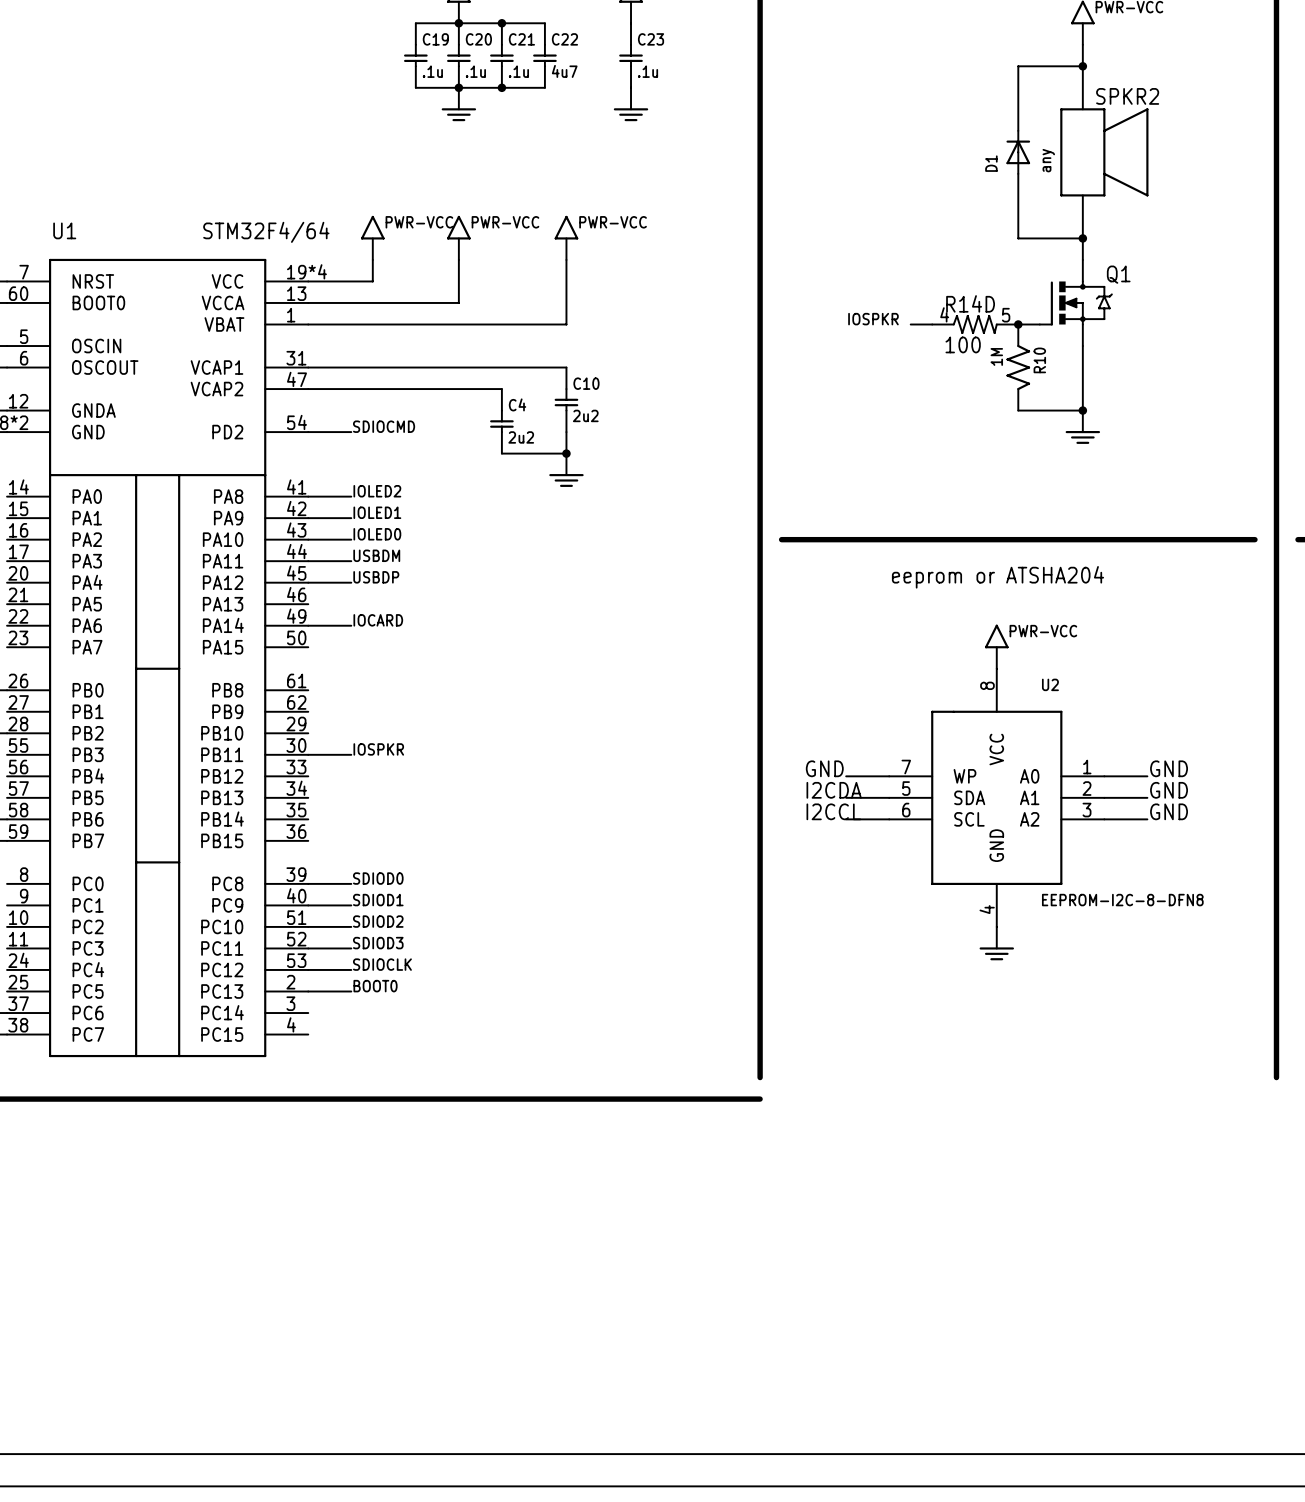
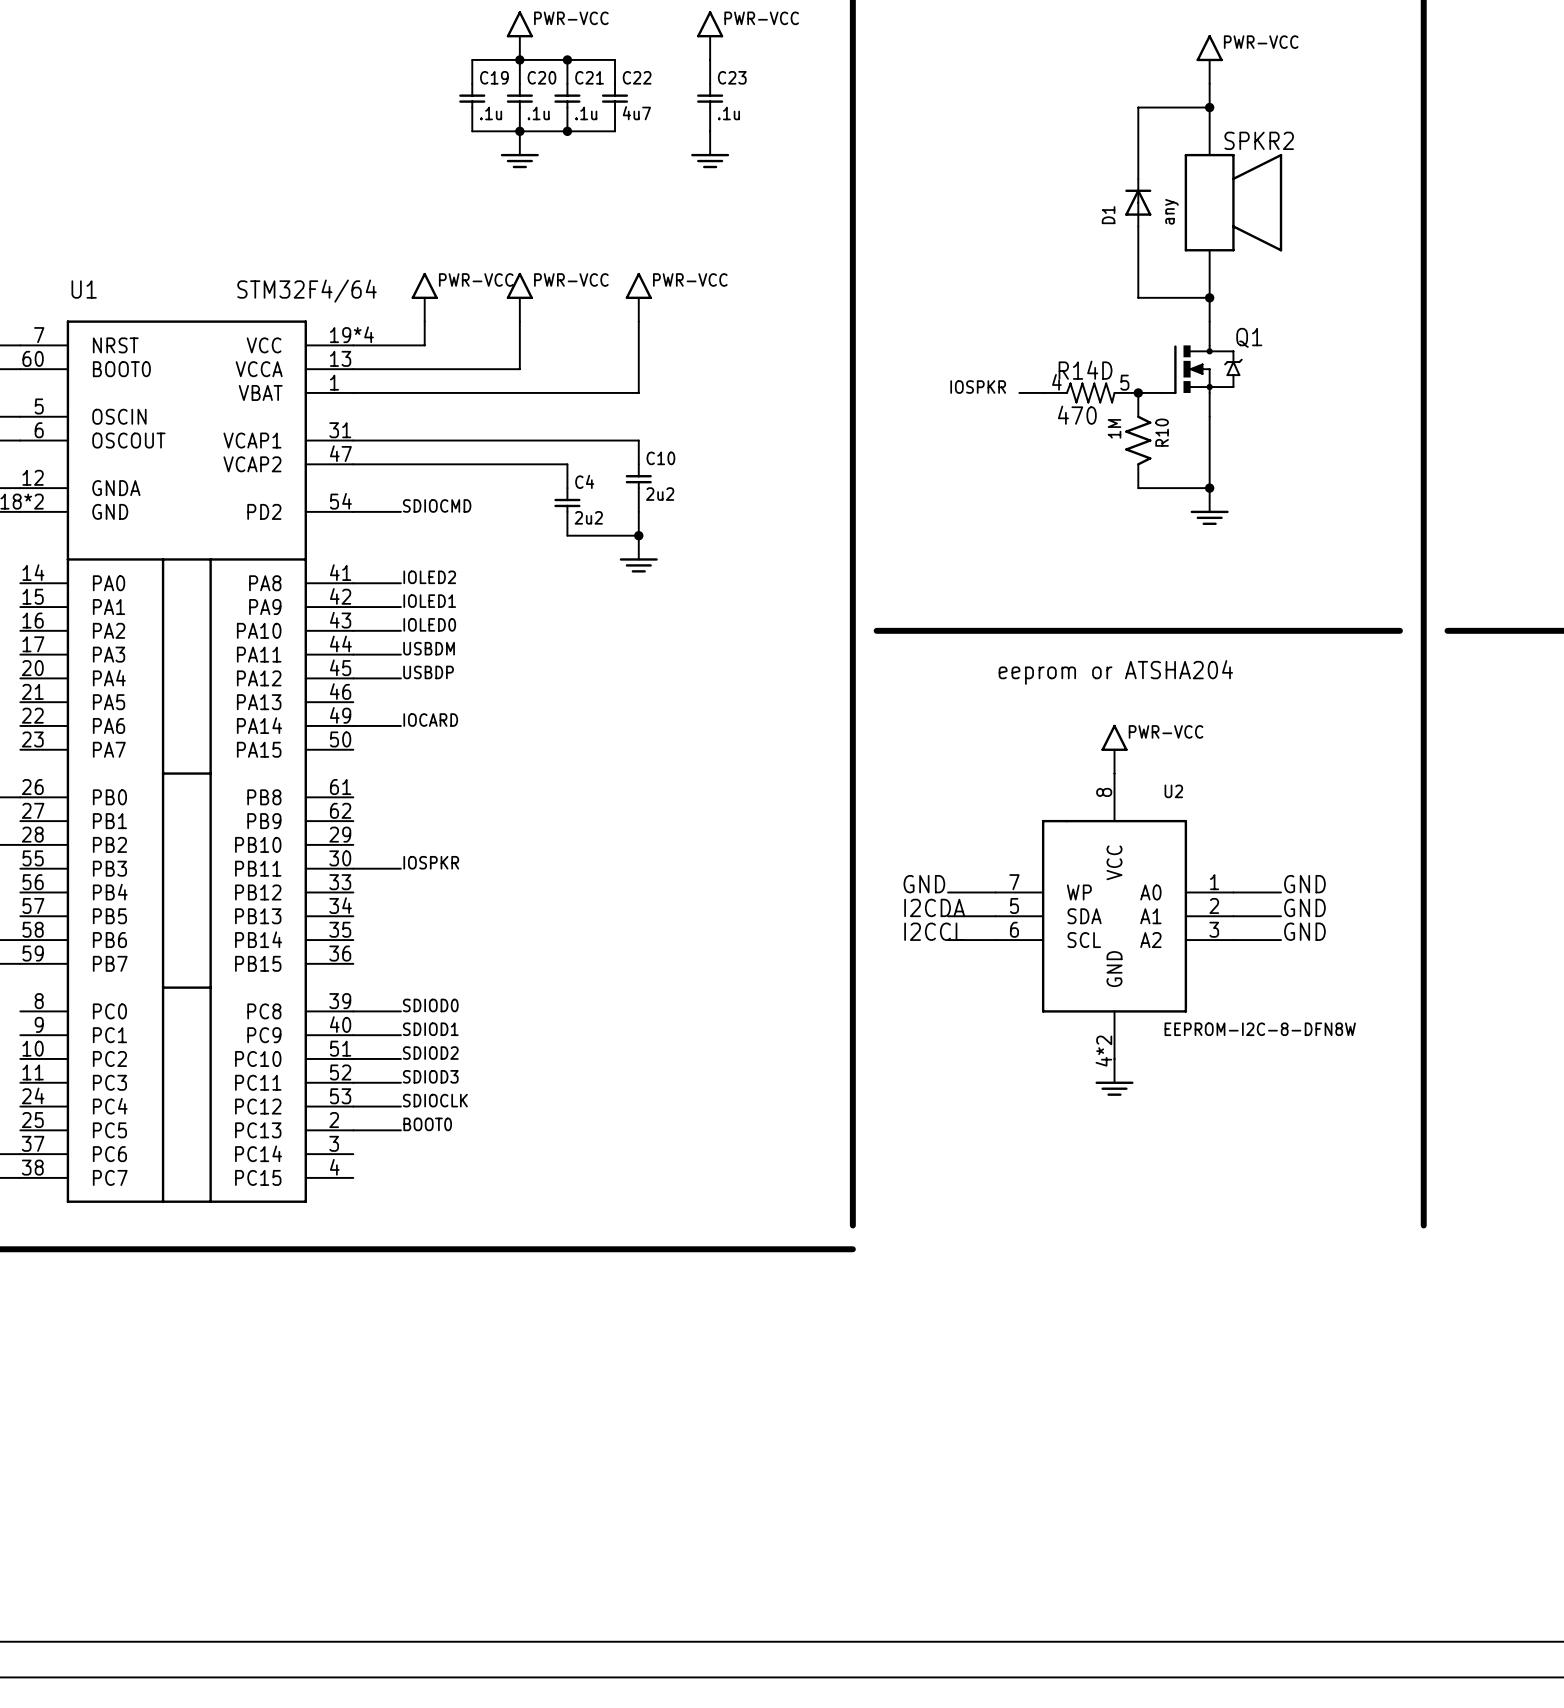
R14D value: 100 (963, 344) -> 470 (1077, 415)
U2 value: EEPROM-I2C-8-DFN8 (1122, 900) -> EEPROM-I2C-8-DFN8W (1260, 1029)
U2 pin number: 4 (987, 909) -> 4*2 (1103, 1051)

